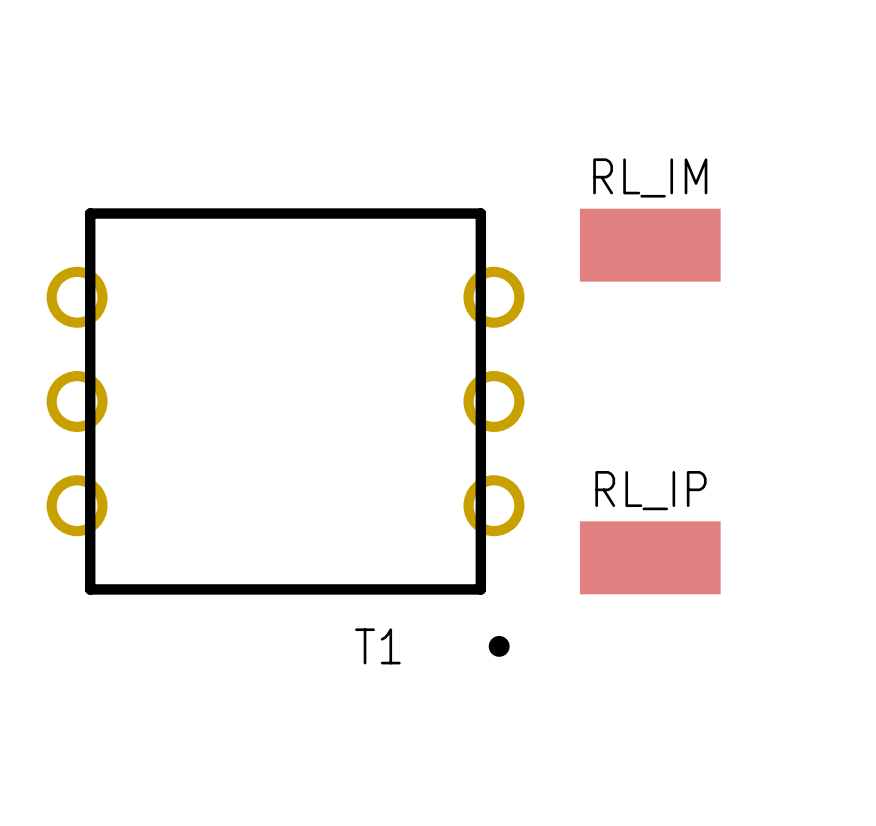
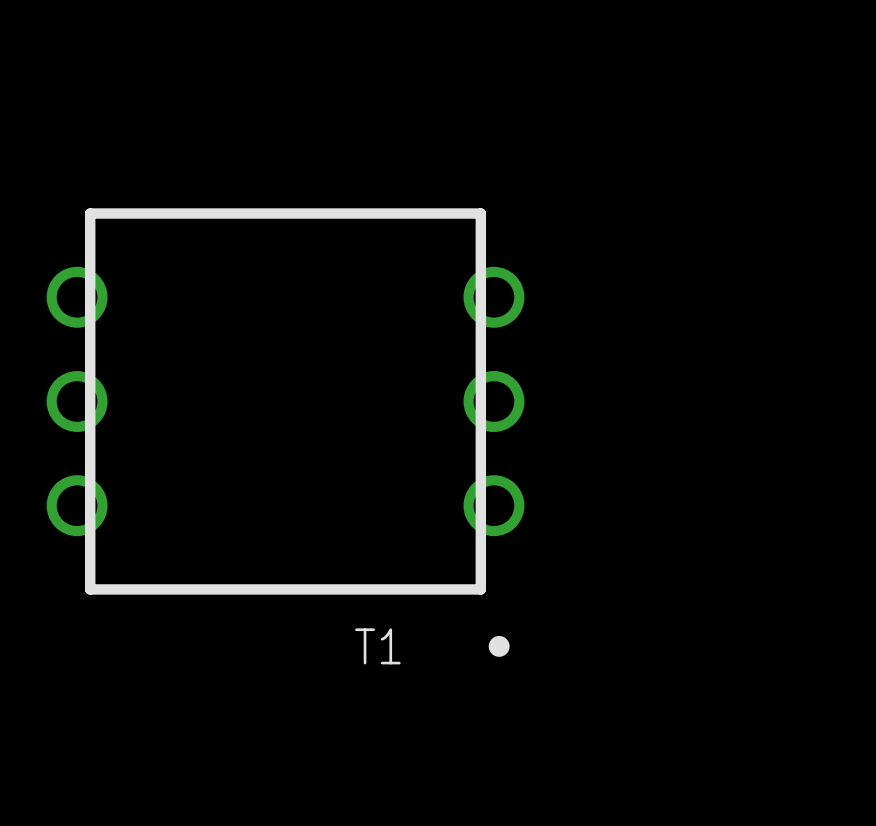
RL_IM: (650, 245) -> none
RL_IP: (650, 557) -> none

